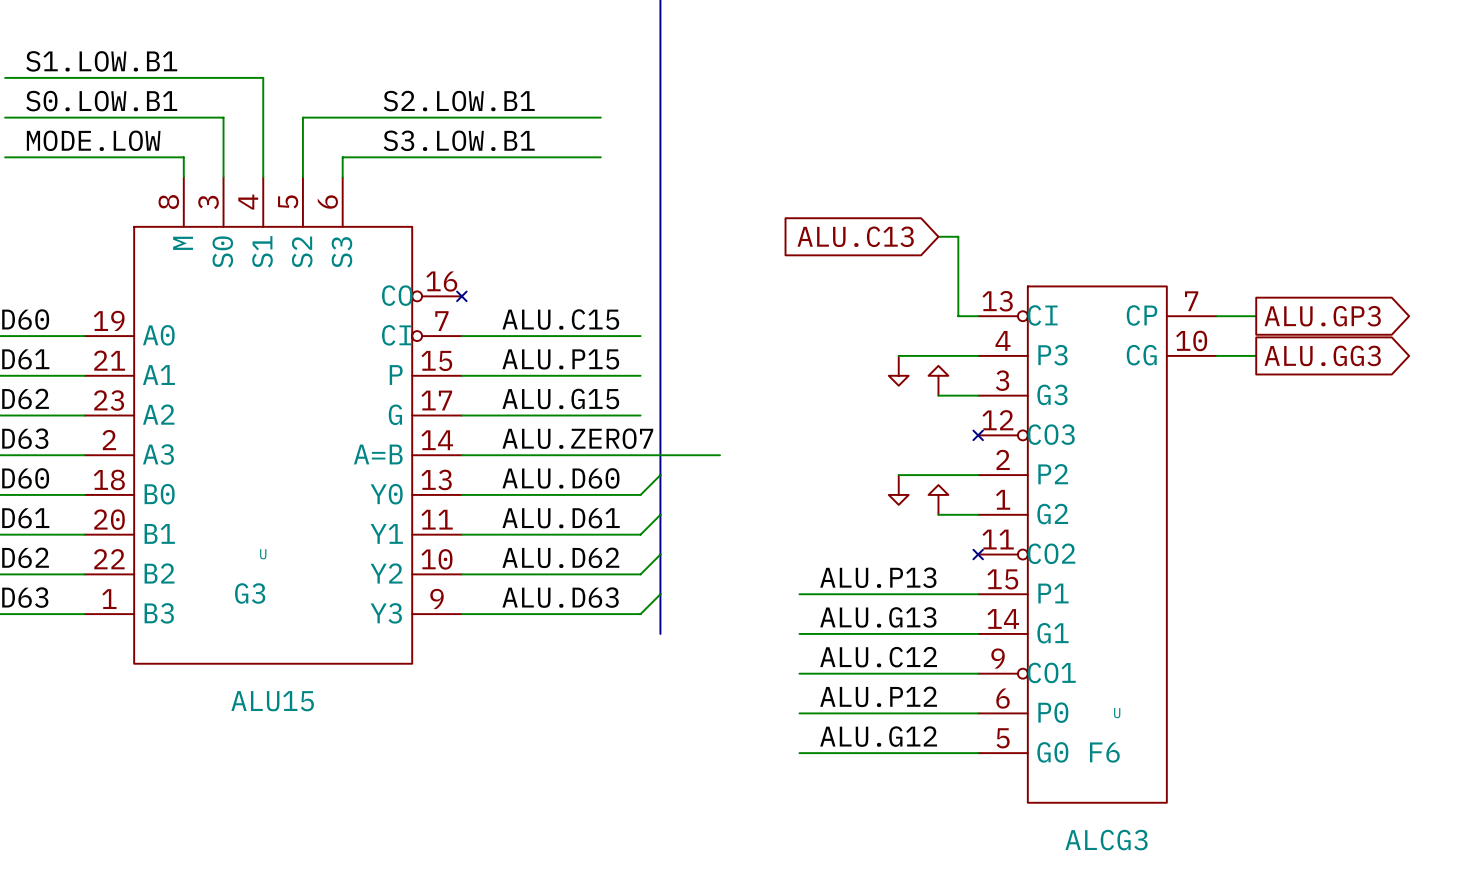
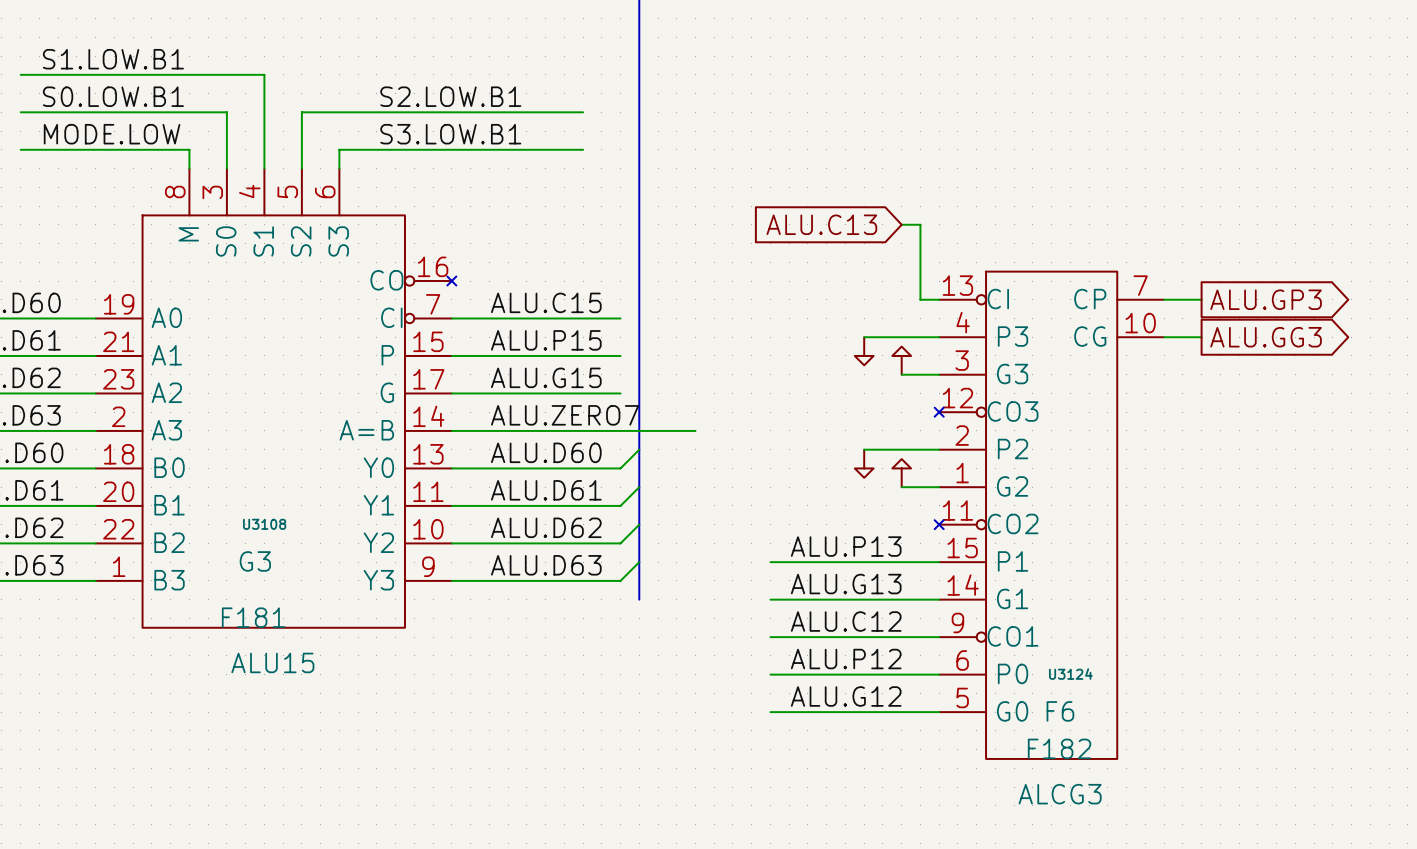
U name: U (263, 554) -> U3108 (264, 524)
U value: none -> F181 (253, 617)
U name: U (1117, 713) -> U3124 (1070, 674)
U value: none -> F182 (1059, 748)

